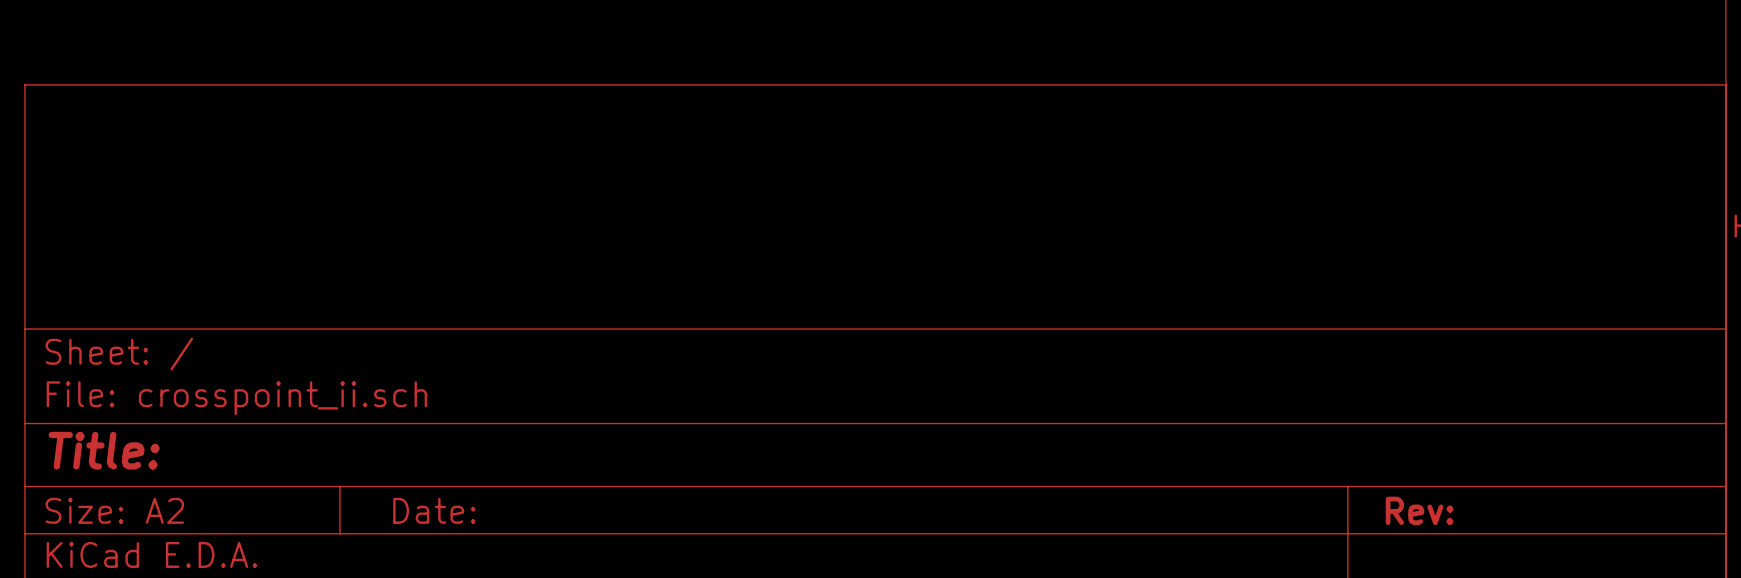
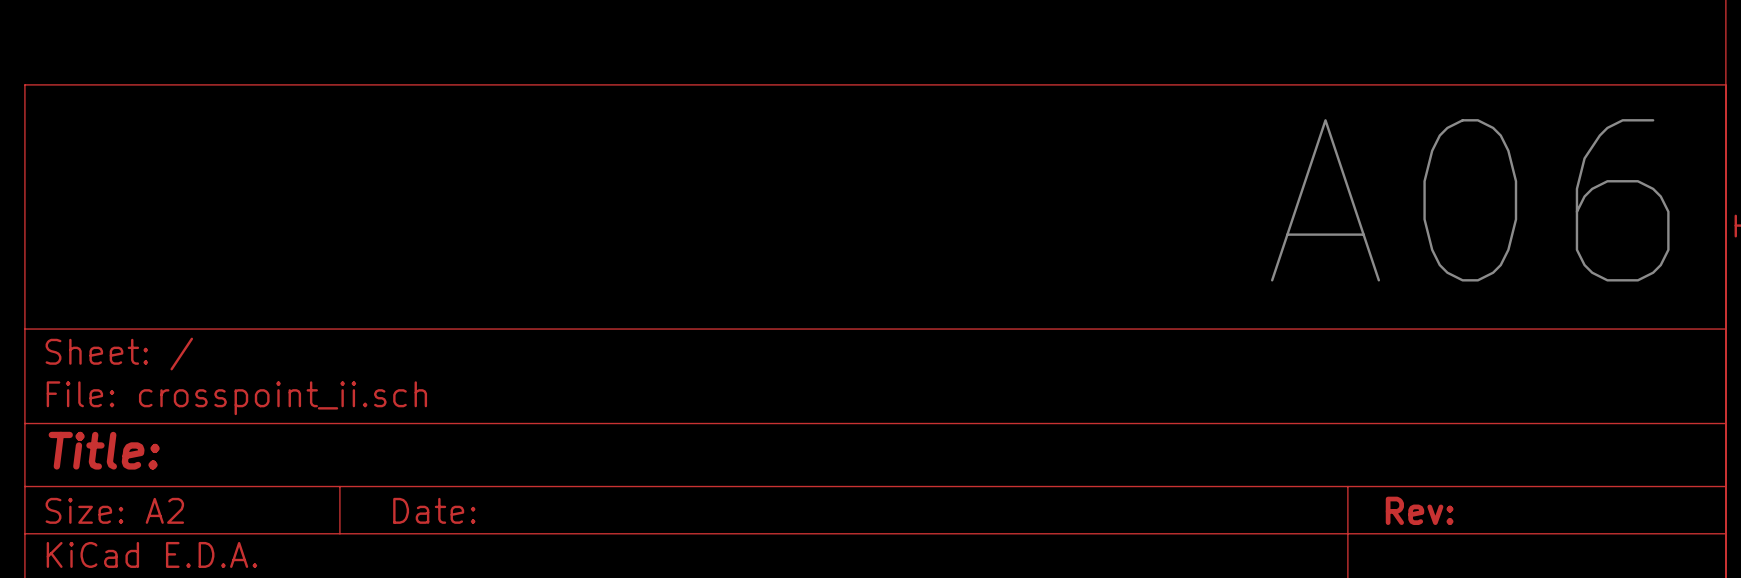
text: none -> A06 (1470, 200)

